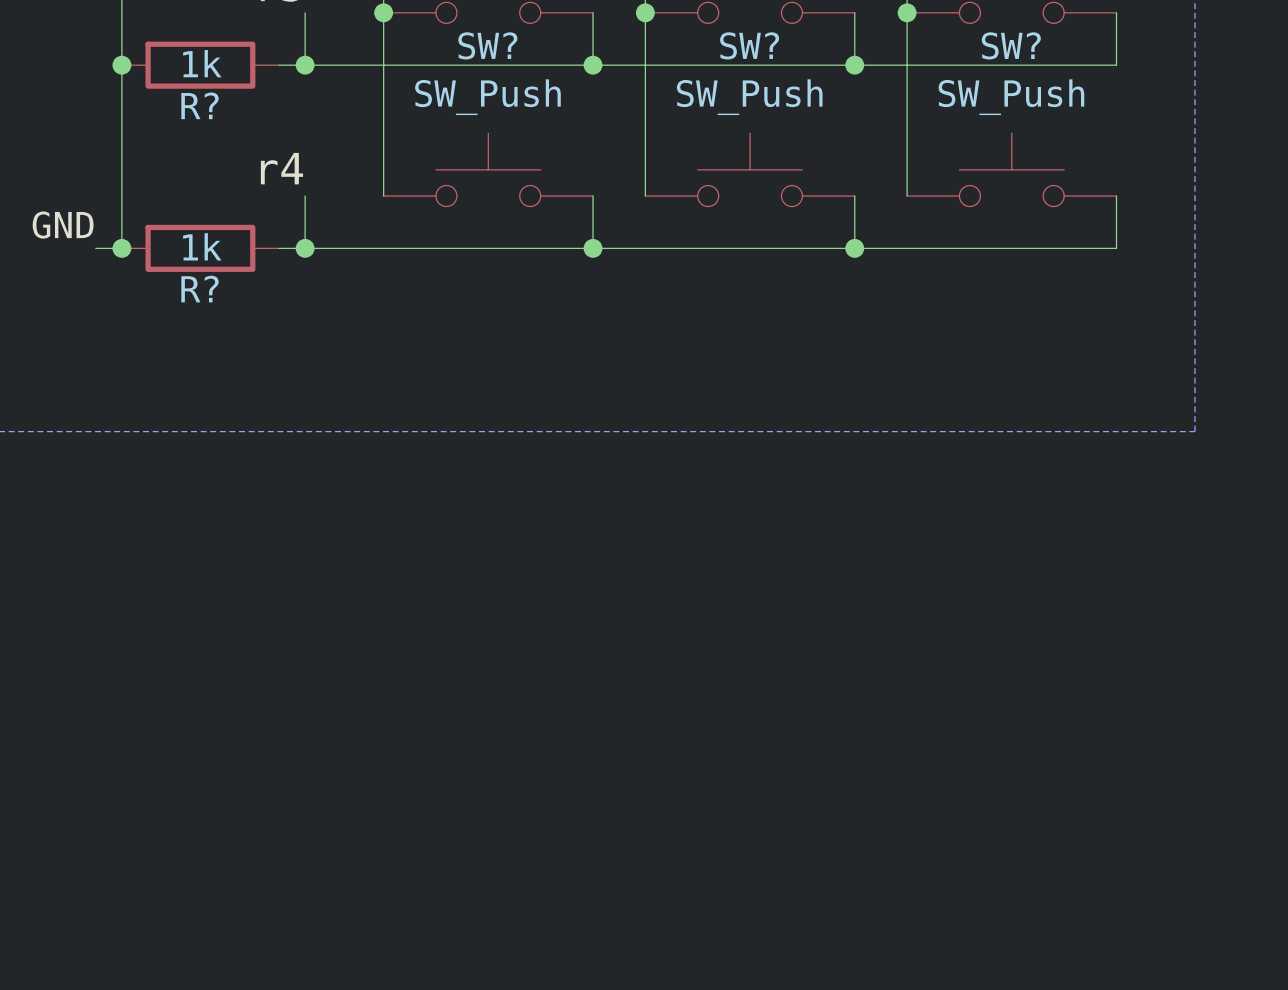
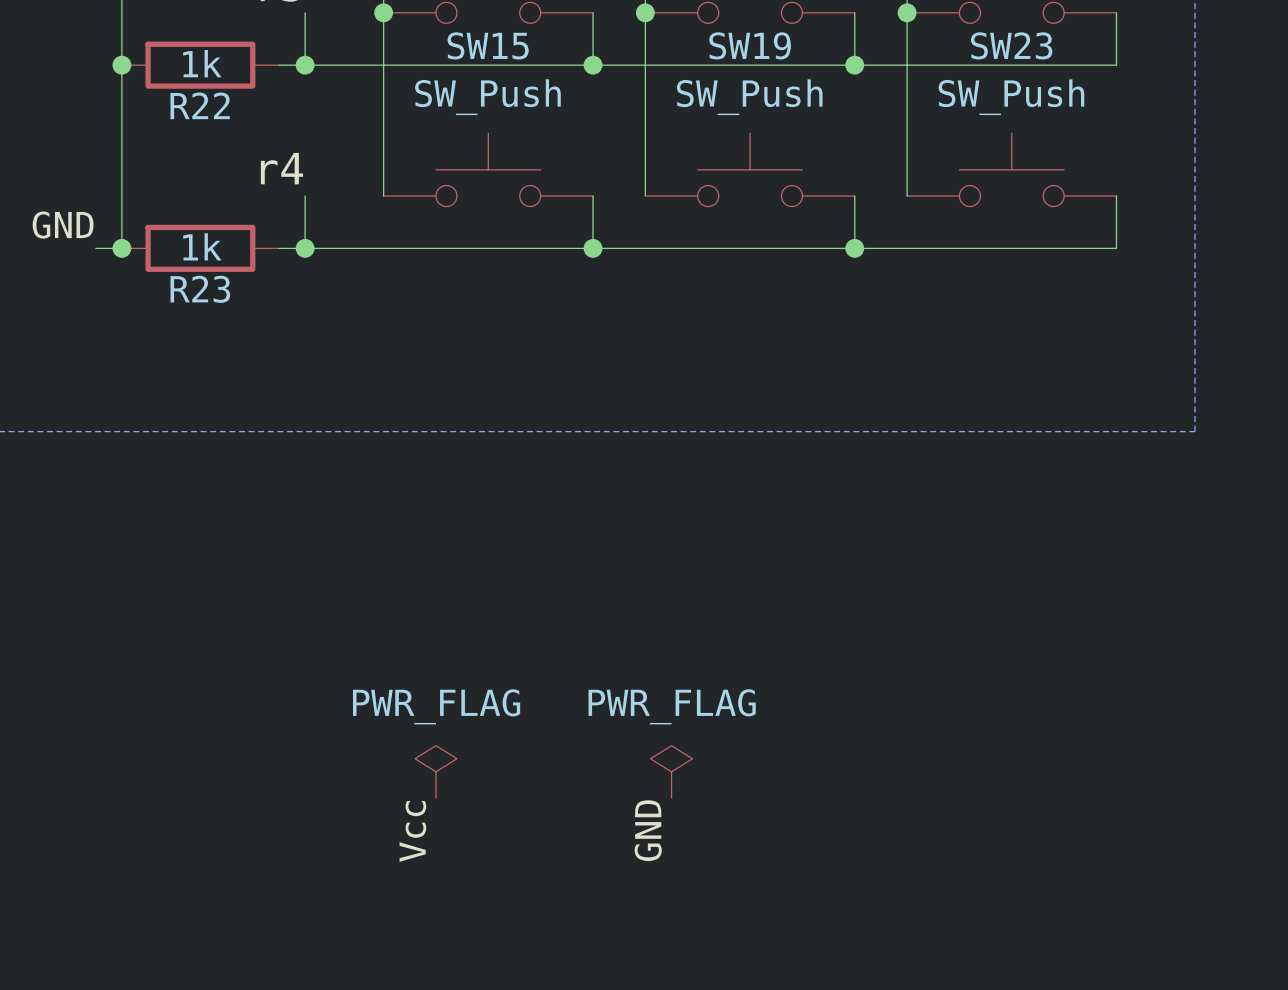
SW? name: SW? (487, 45) -> SW15 (488, 45)
SW? name: SW? (749, 45) -> SW19 (750, 45)
SW? name: SW? (1011, 45) -> SW23 (1011, 45)
R? name: R? (199, 105) -> R22 (200, 105)
R? name: R? (199, 289) -> R23 (200, 289)
power symbol: none -> PWR_FLAG (435, 771)
power symbol: none -> PWR_FLAG (671, 771)
label: none -> GND (648, 830)
label: none -> Vcc (412, 831)

